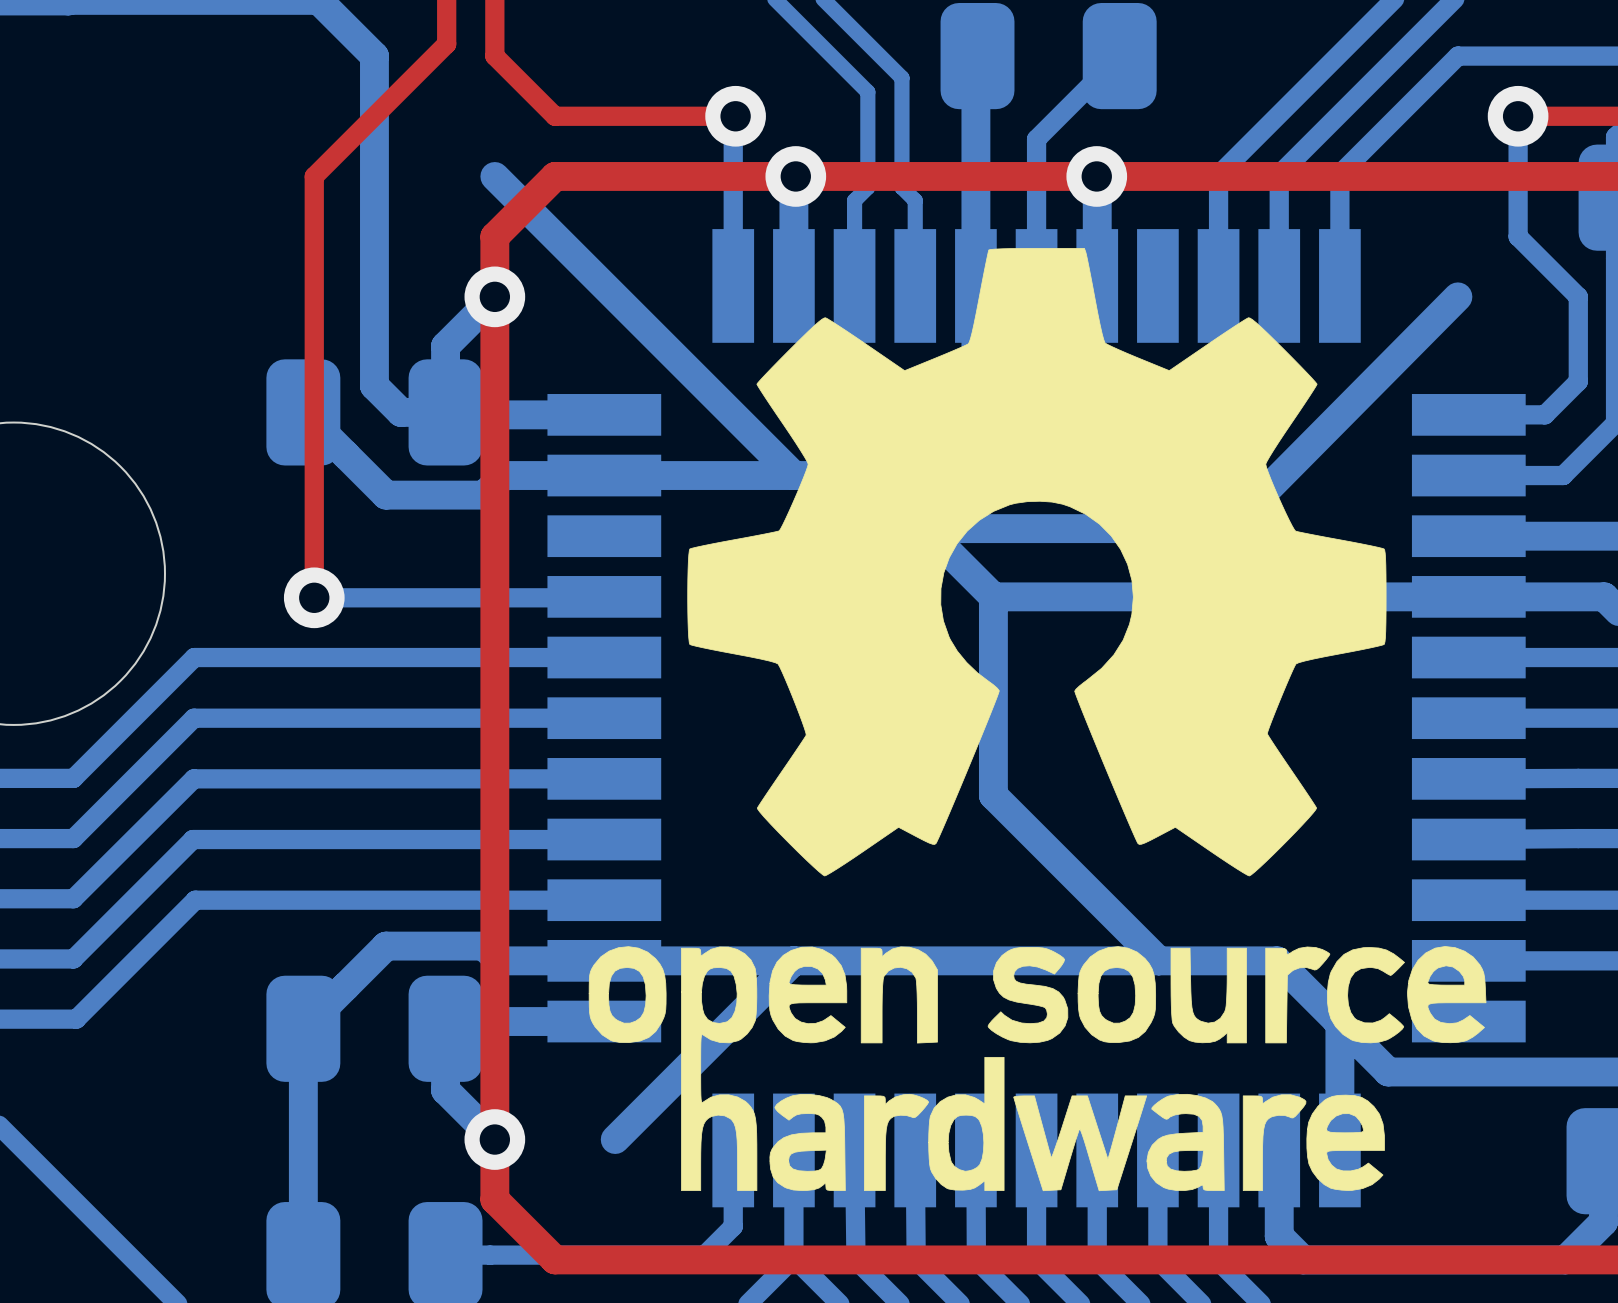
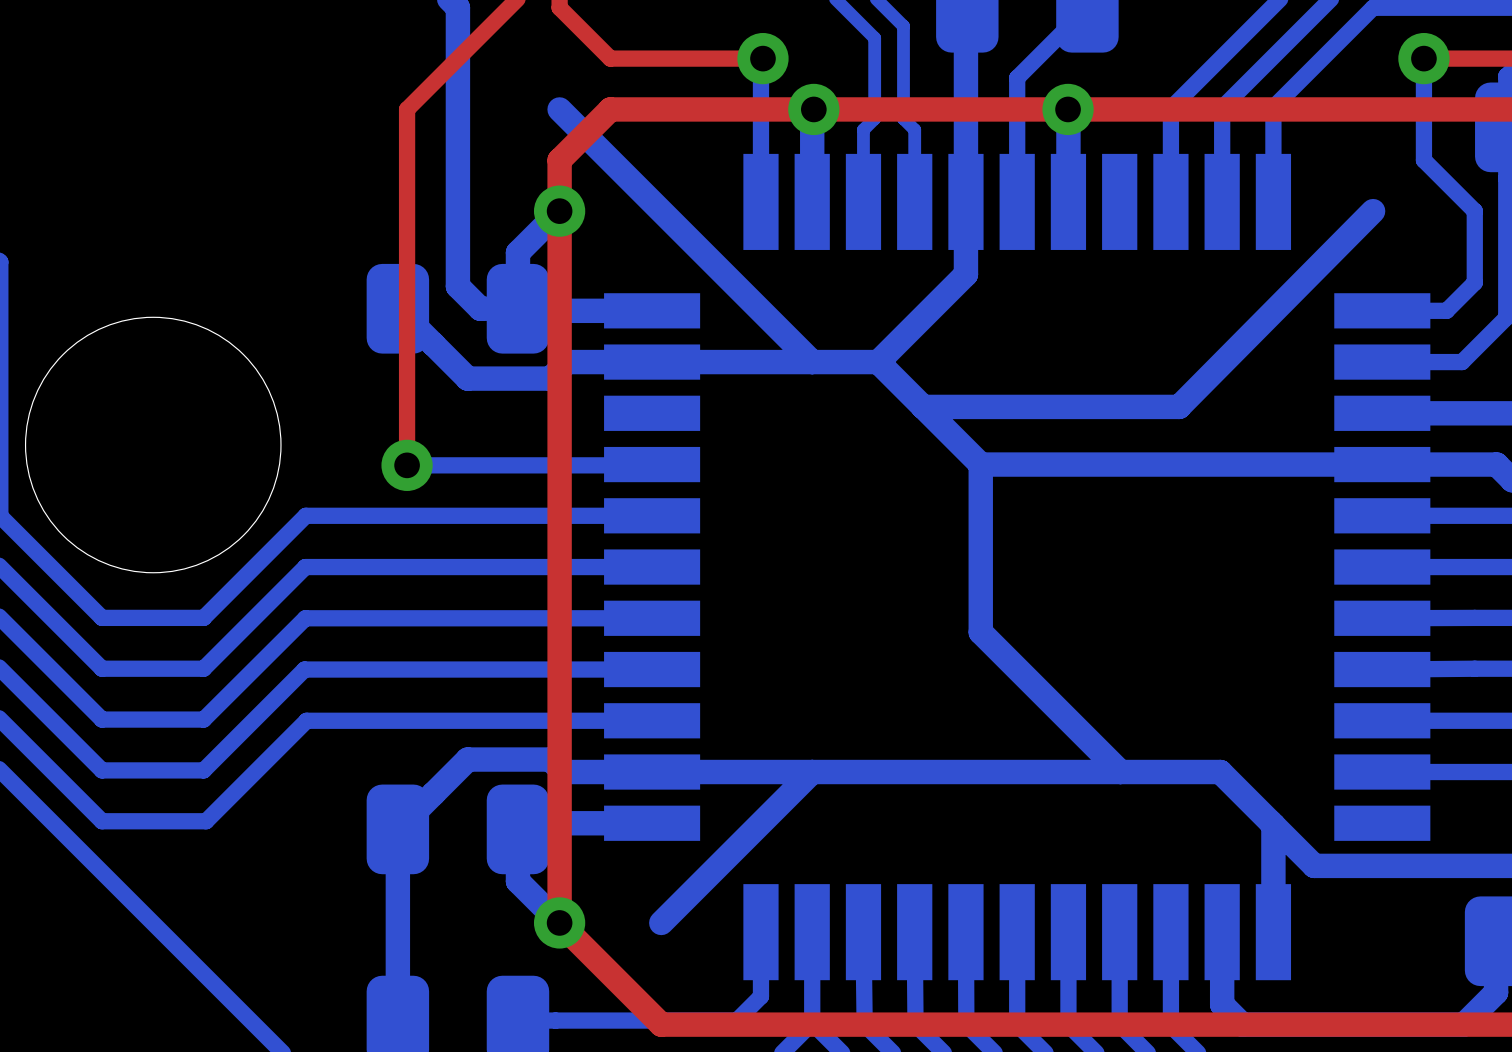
drawing: [588, 248, 1487, 1192] -> none
top track: (494, 1139) (494, 1199) (555, 1259) (615, 1259) -> (559, 922) (661, 1024)

